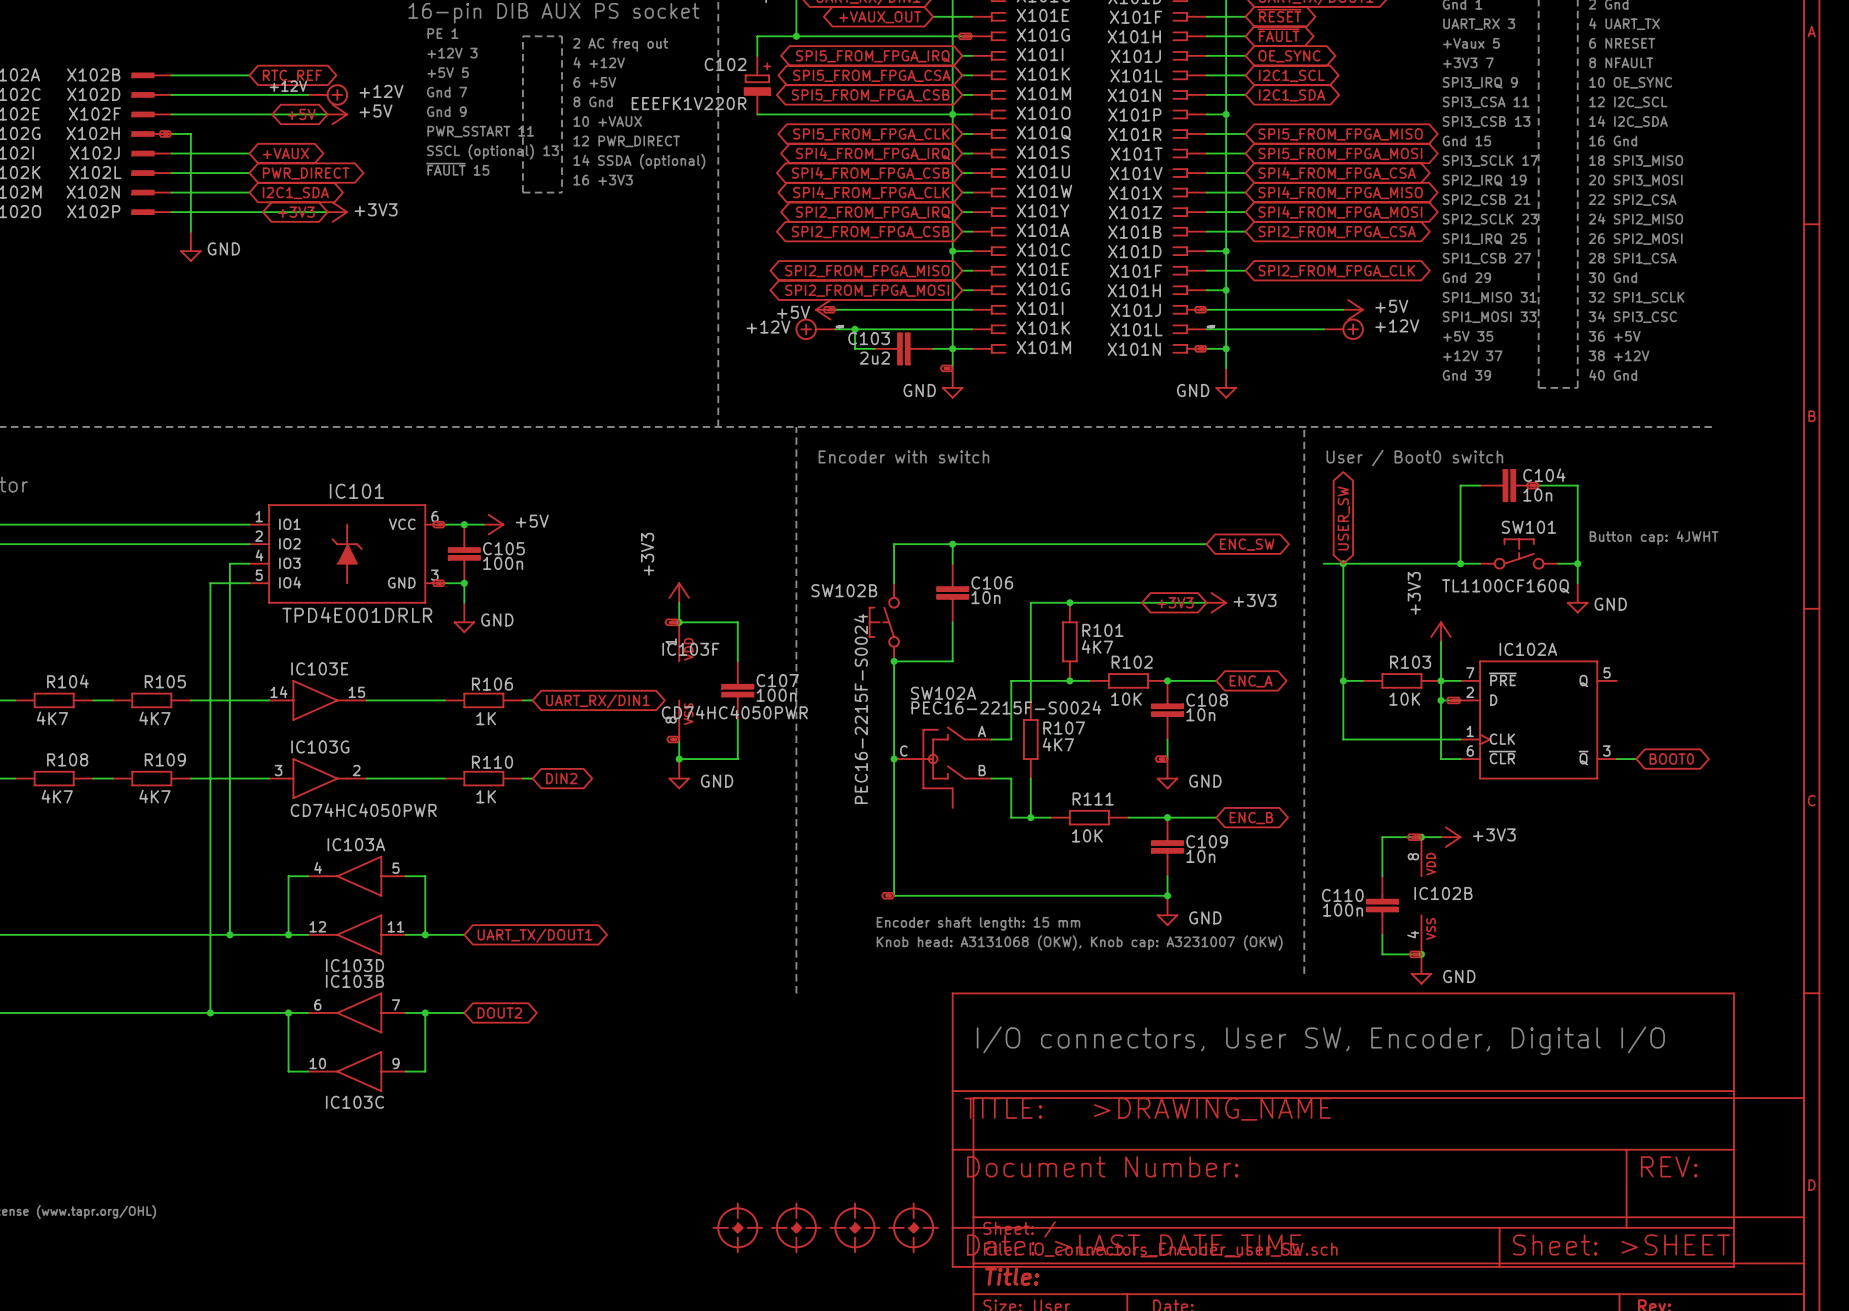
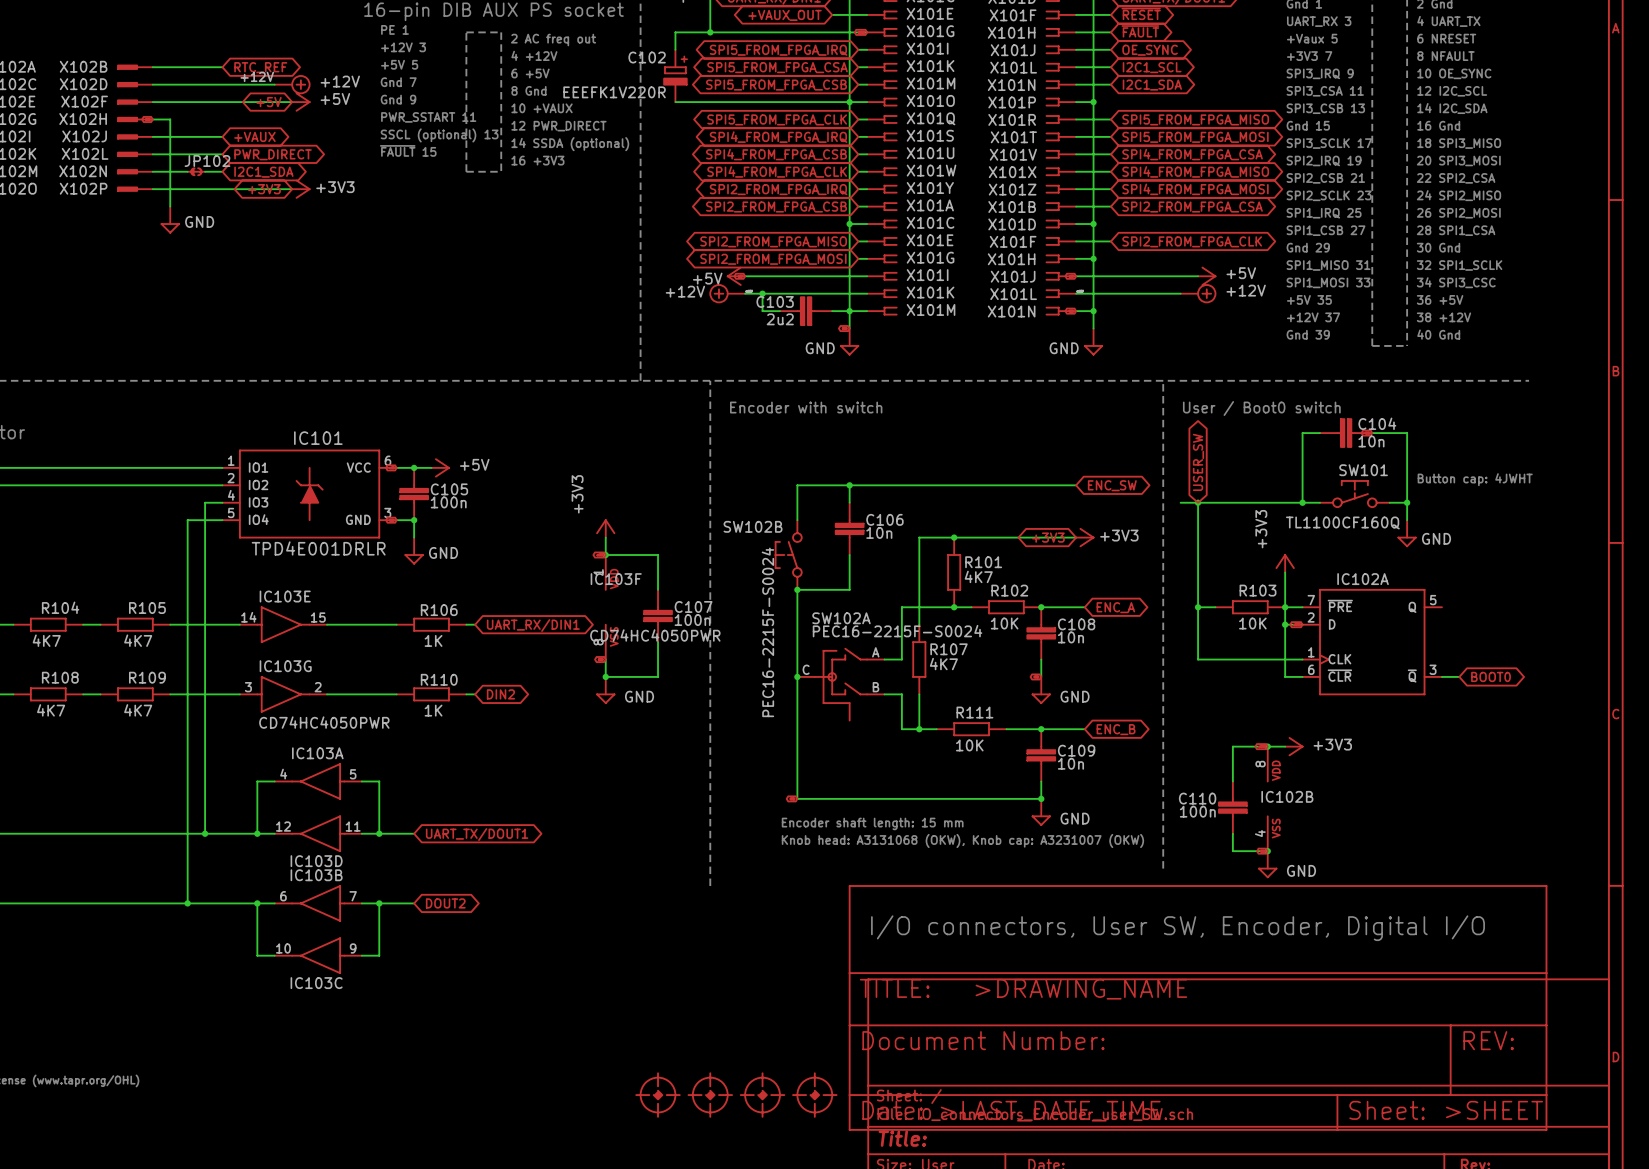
JP102: none -> (196, 171)

